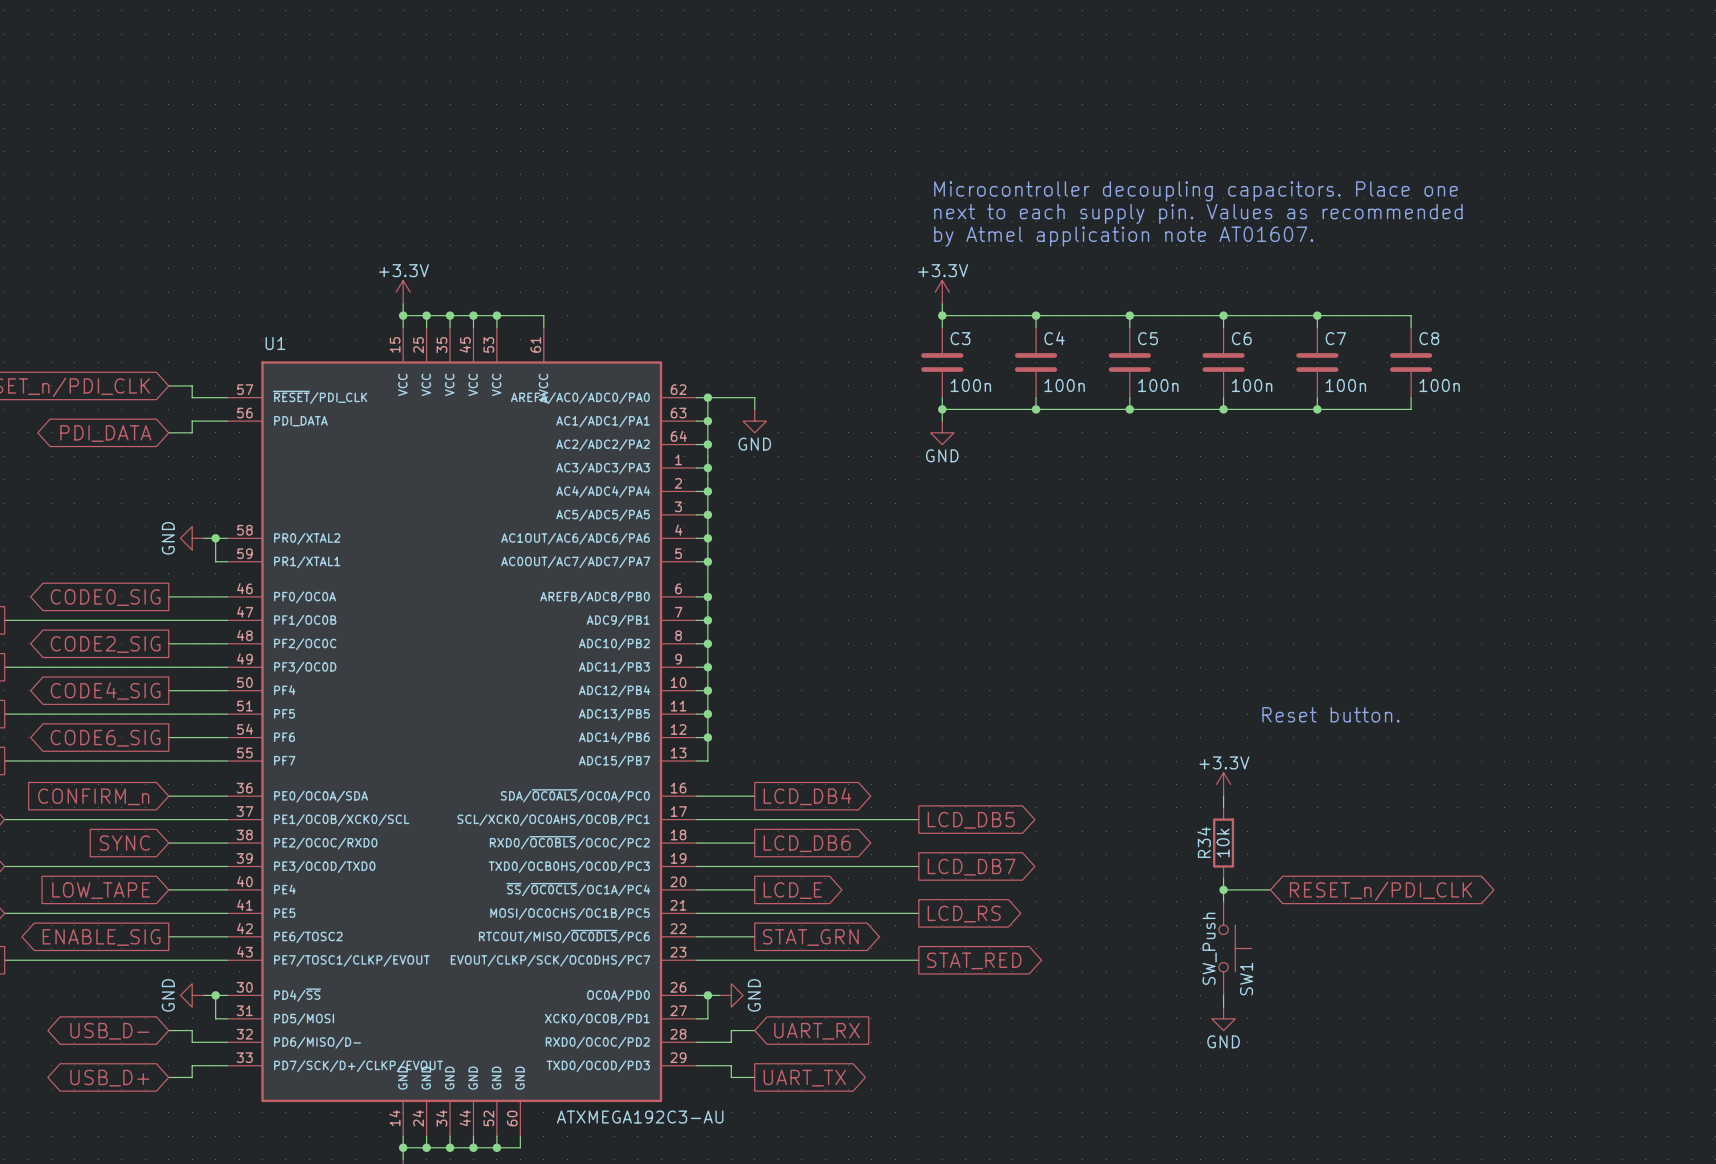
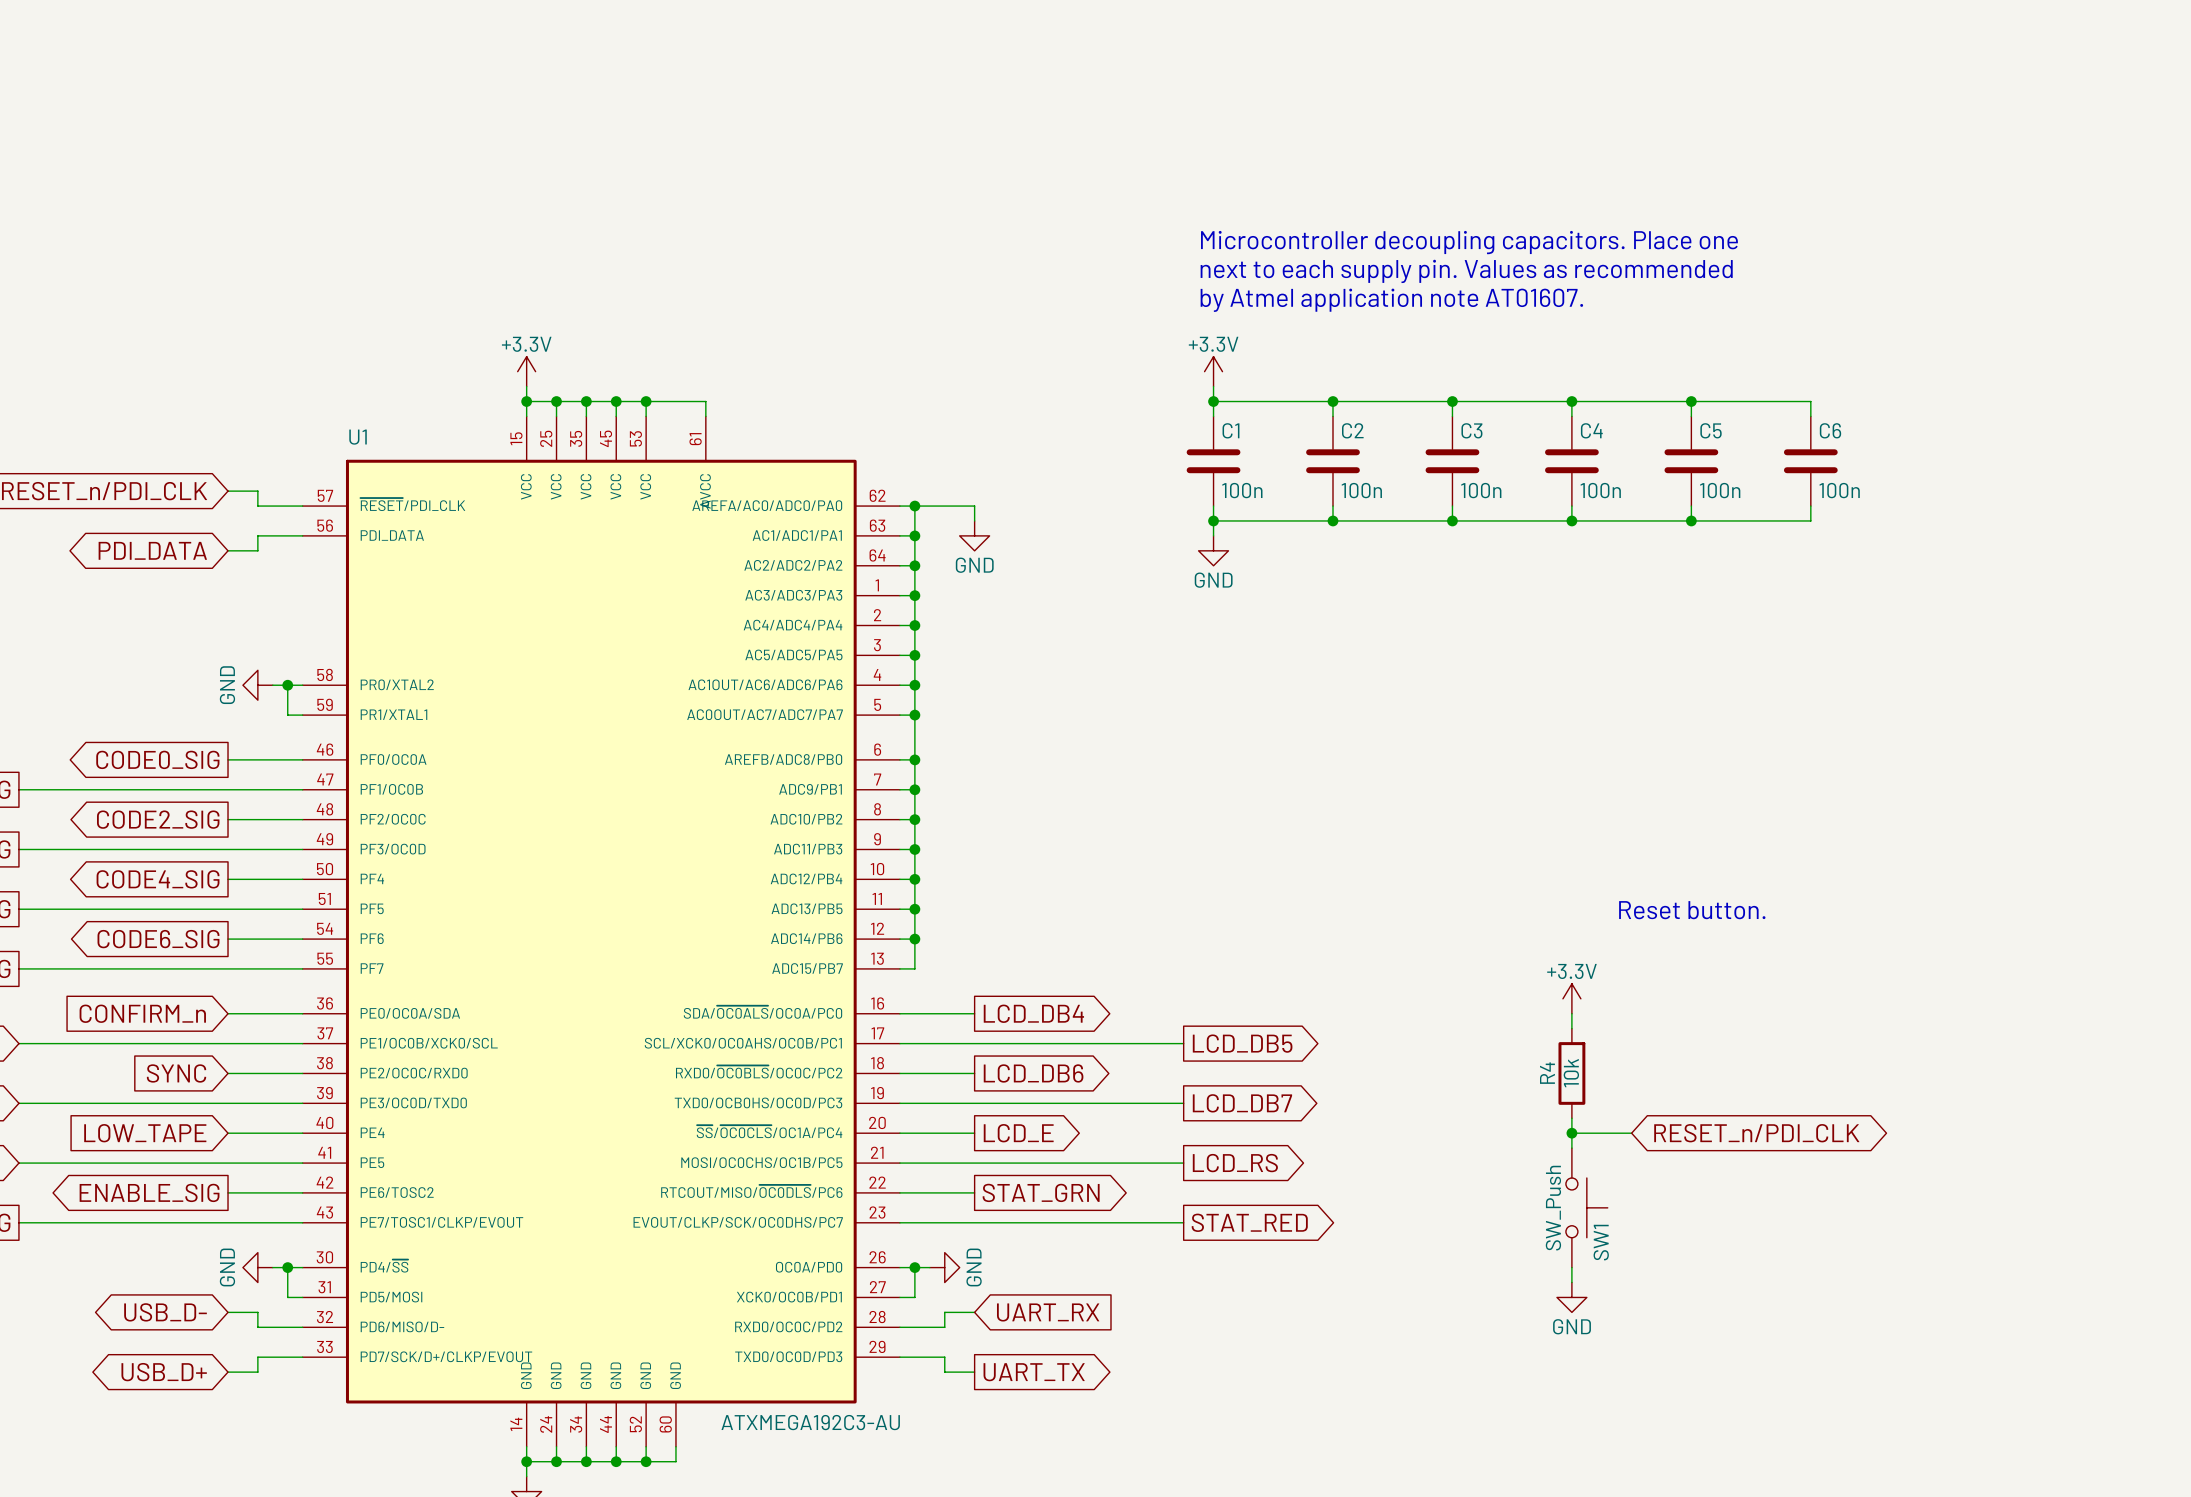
C3 name: C3 (960, 338) -> C1 (1230, 430)
C4 name: C4 (1054, 338) -> C2 (1352, 430)
C5 name: C5 (1148, 338) -> C3 (1471, 430)
C6 name: C6 (1241, 338) -> C4 (1591, 430)
C7 name: C7 (1335, 338) -> C5 (1711, 430)
C8 name: C8 (1429, 338) -> C6 (1830, 430)
R34 name: R34 (1204, 842) -> R4 (1547, 1073)

